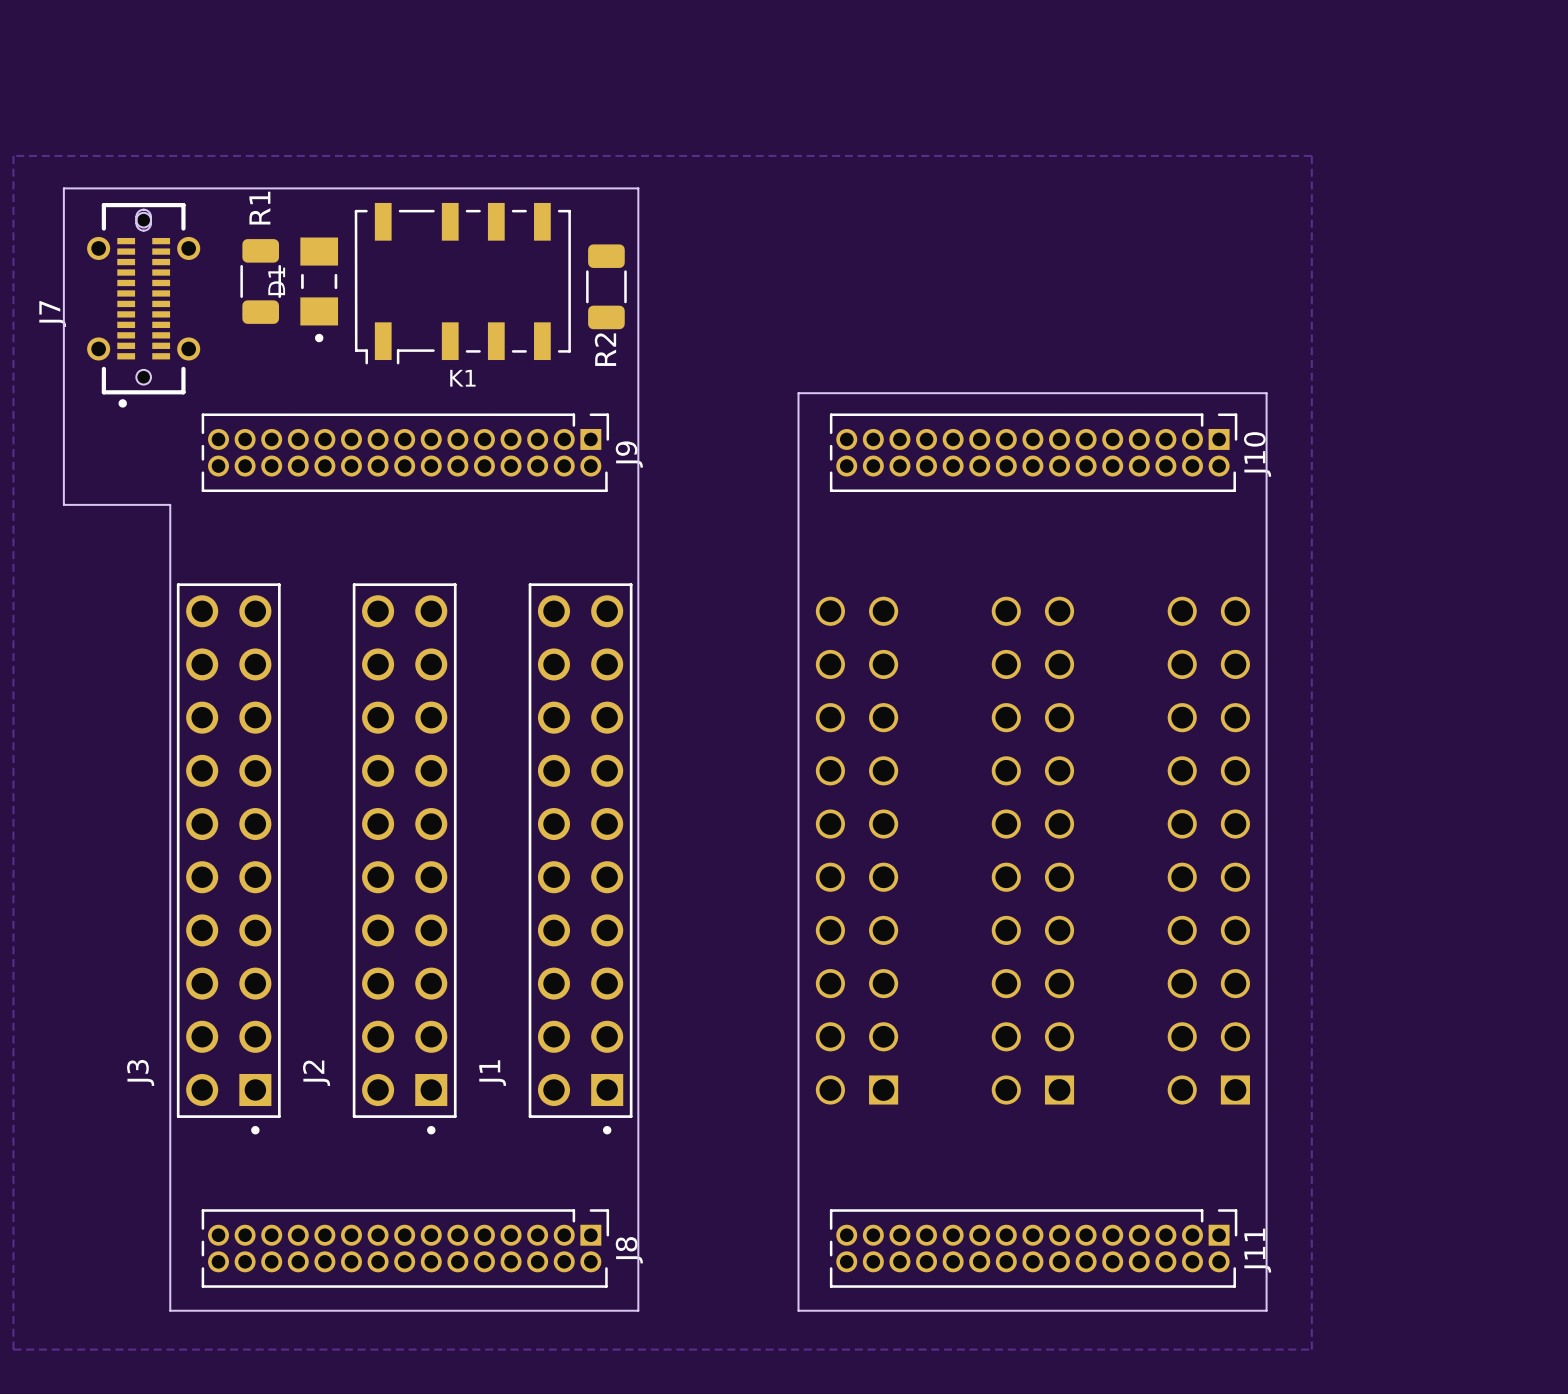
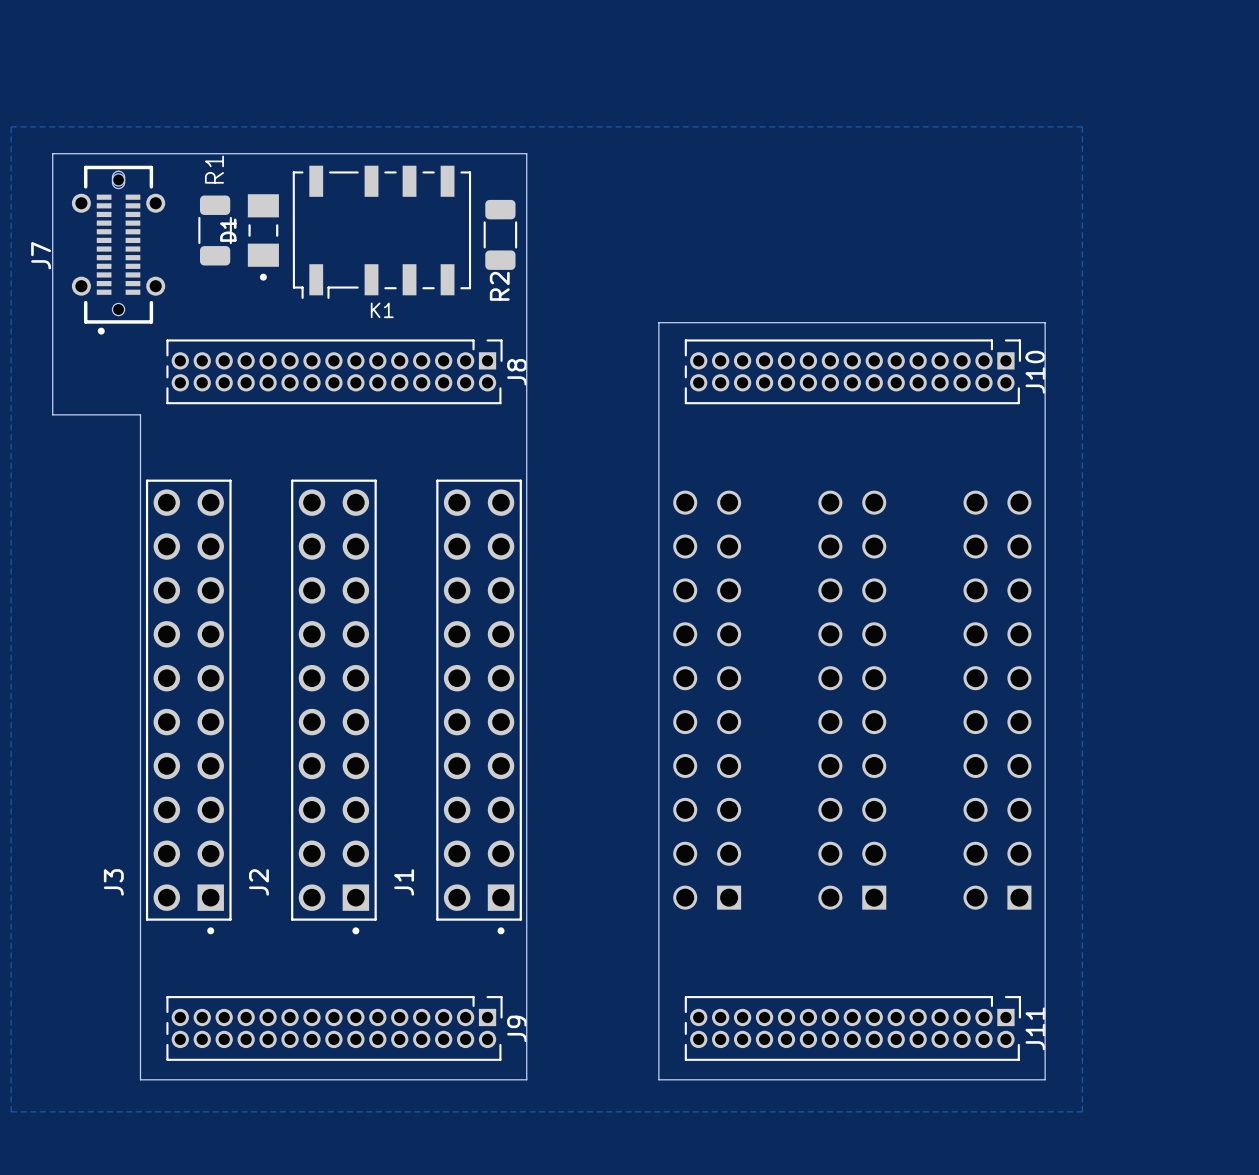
J9 name: J9 (629, 454) -> J8 (517, 372)
J8 name: J8 (629, 1250) -> J9 (517, 1028)

